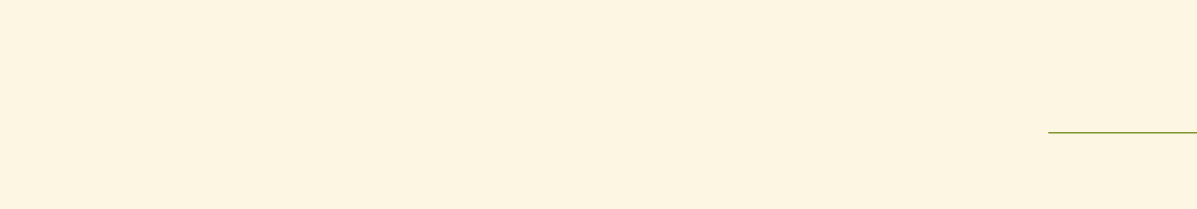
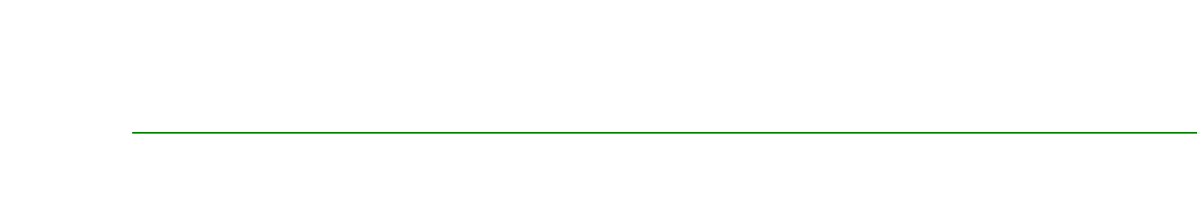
wire: none -> (132, 132) (1048, 132)

